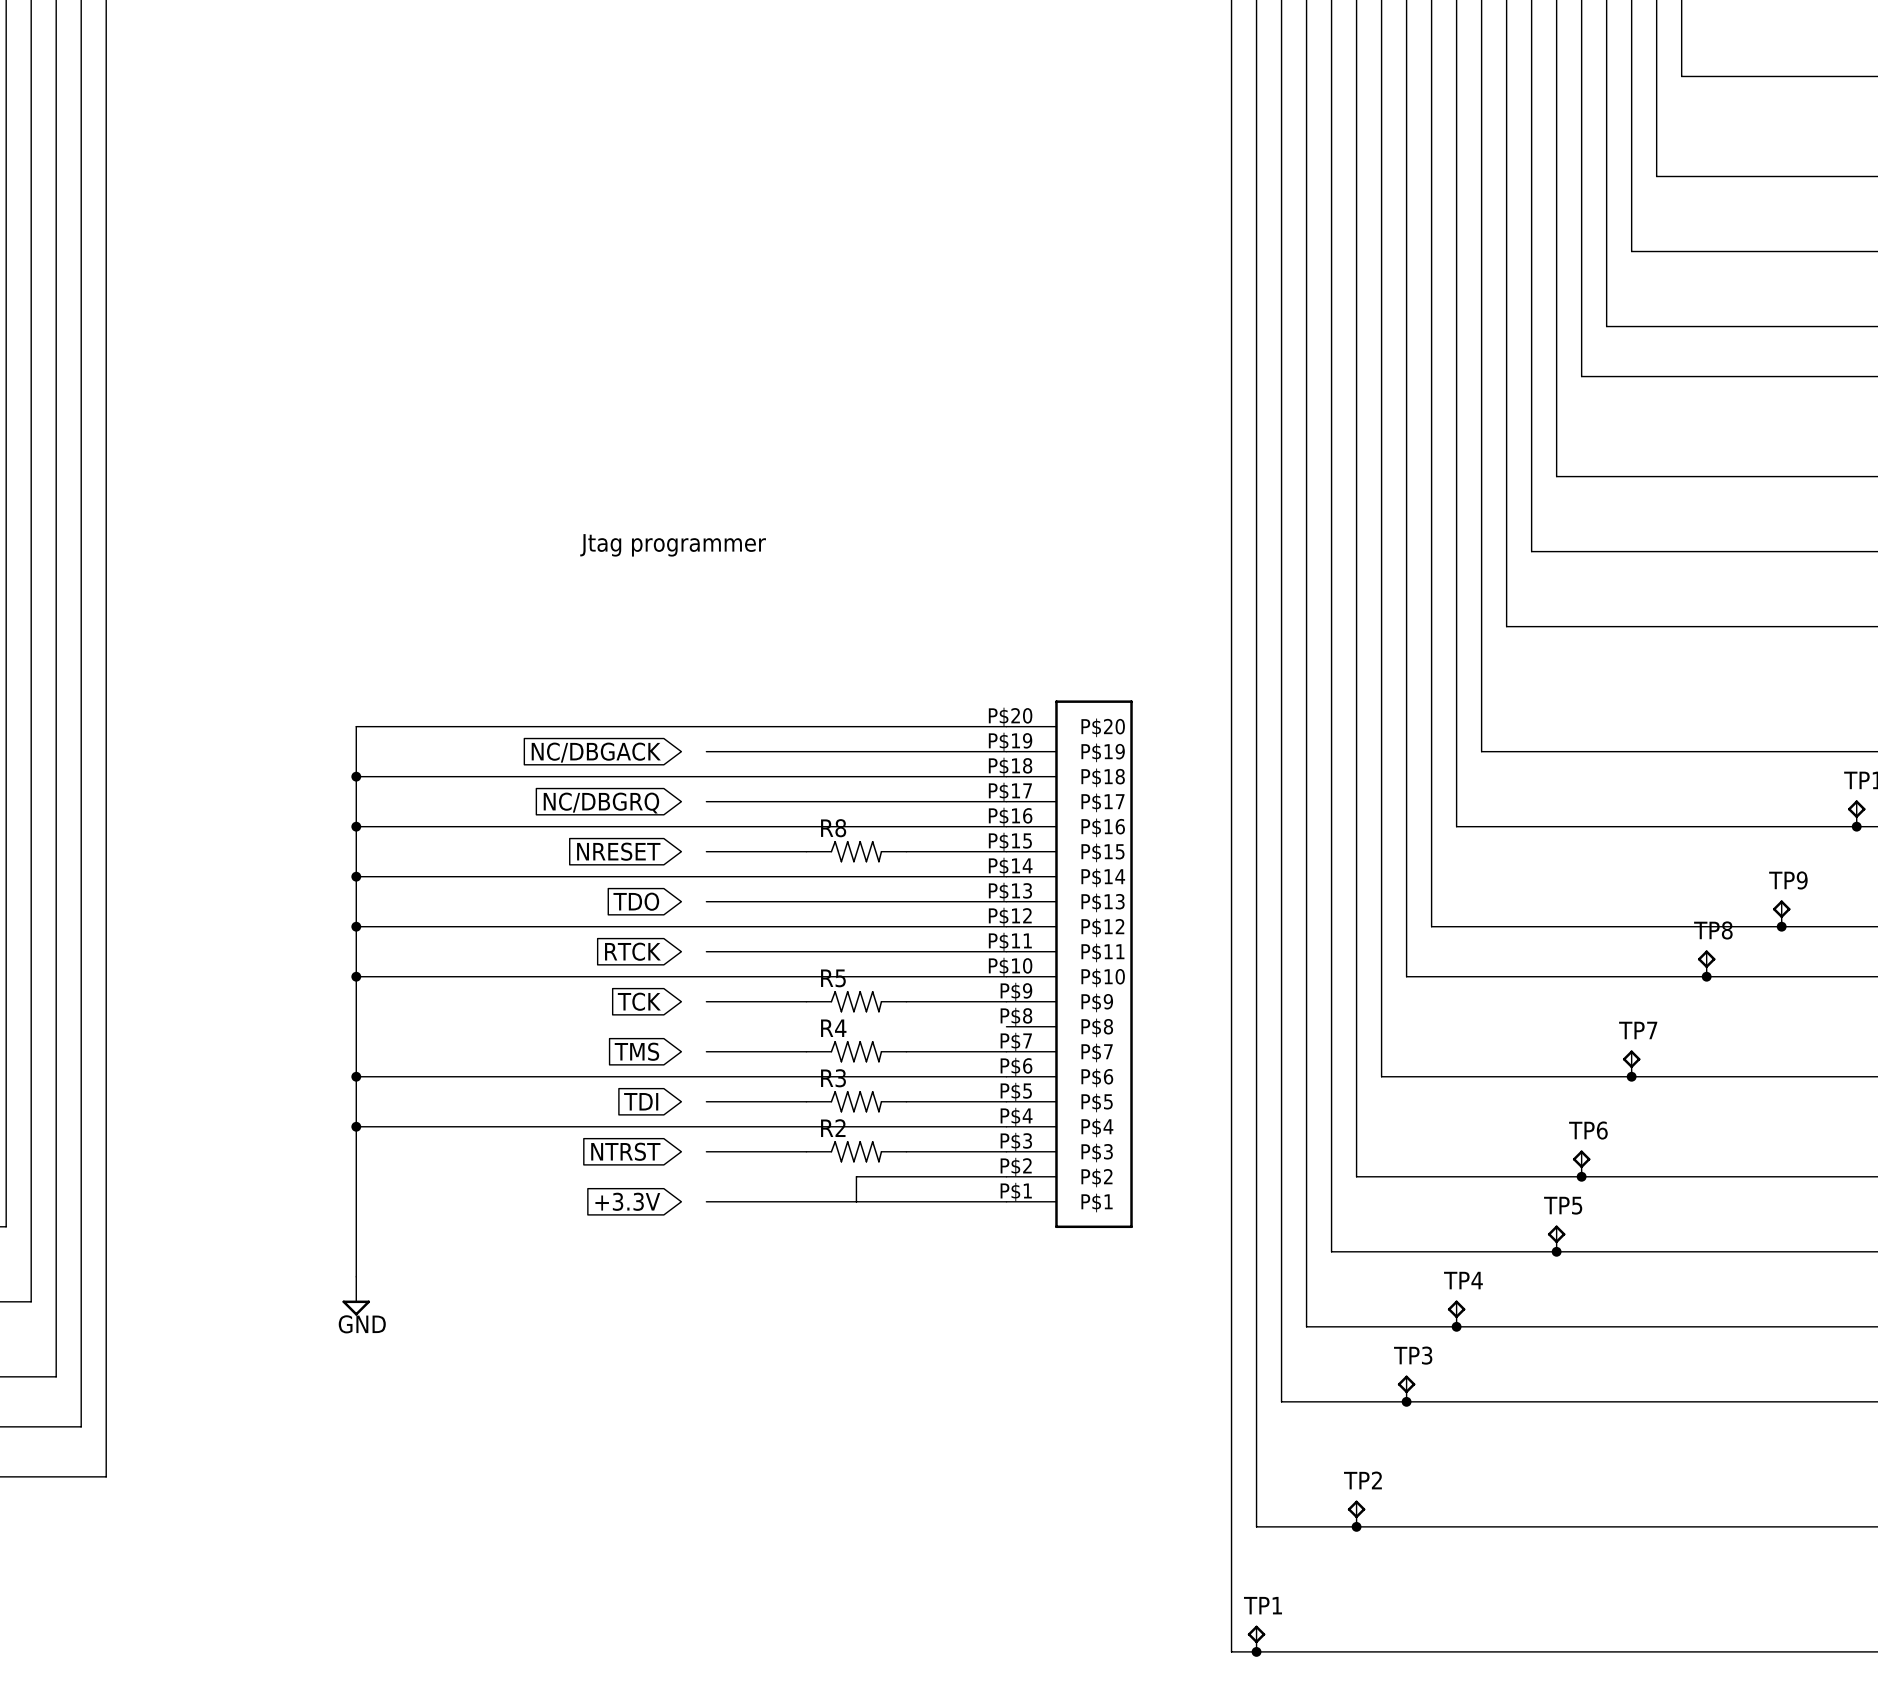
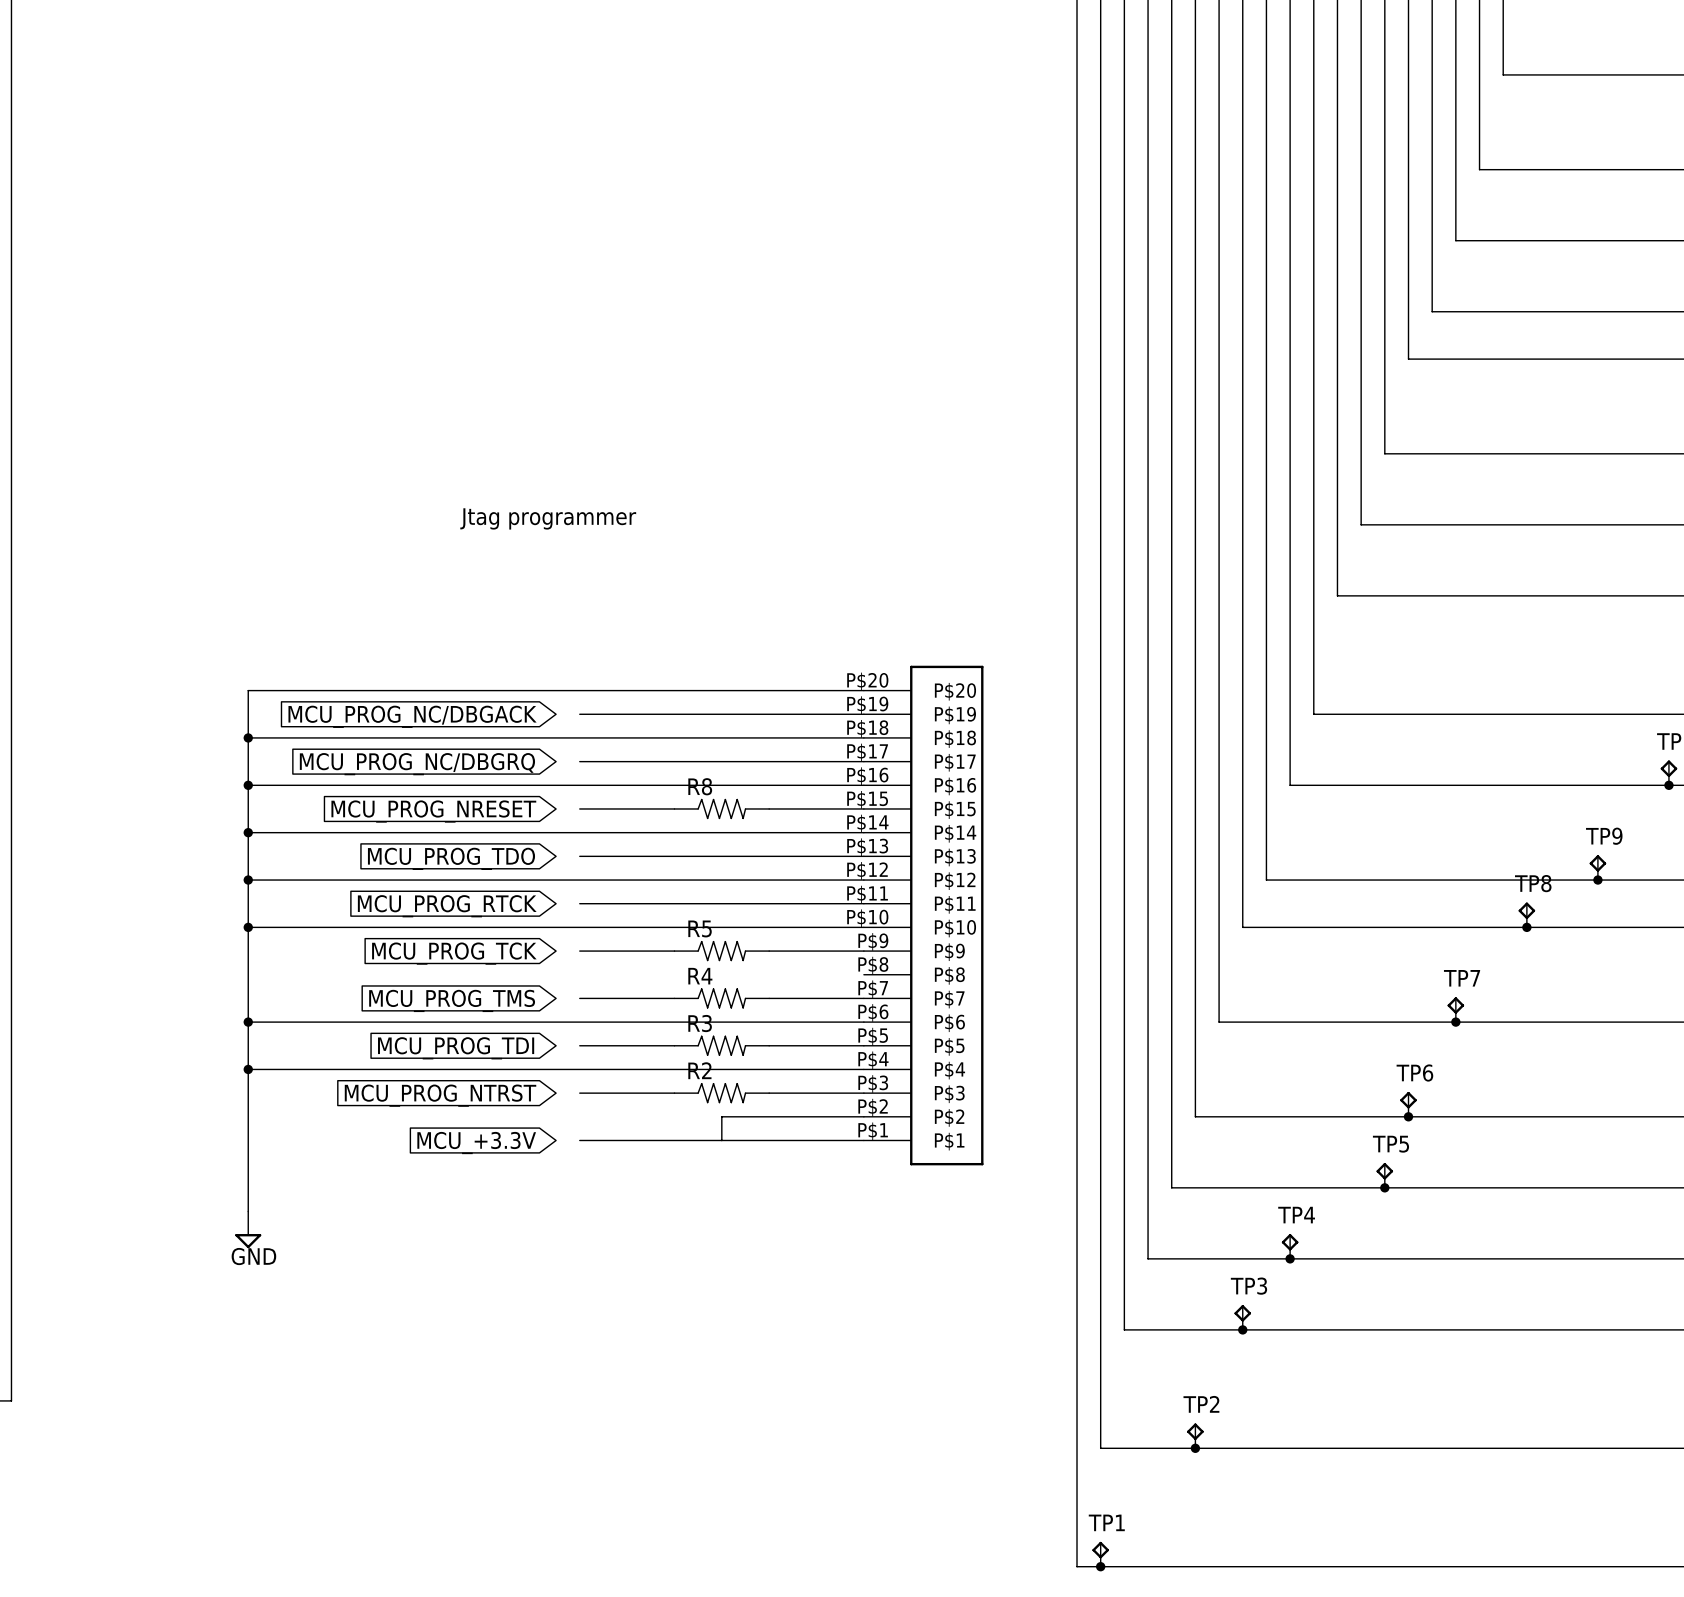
global label: NC/DBGACK (596, 752) -> MCU_PROG_NC/DBGACK (412, 716)
global label: NC/DBGRQ (601, 803) -> MCU_PROG_NC/DBGRQ (417, 764)
global label: NRESET (618, 851) -> MCU_PROG_NRESET (433, 811)
global label: TDO (636, 901) -> MCU_PROG_TDO (451, 858)
global label: RTCK (632, 951) -> MCU_PROG_RTCK (447, 906)
global label: TCK (639, 1001) -> MCU_PROG_TCK (454, 953)
global label: TMS (636, 1051) -> MCU_PROG_TMS (452, 1000)
global label: TDI (641, 1101) -> MCU_PROG_TDI (456, 1048)
global label: NTRST (625, 1151) -> MCU_PROG_NTRST (440, 1095)
global label: +3.3V (627, 1201) -> MCU_+3.3V (476, 1143)

